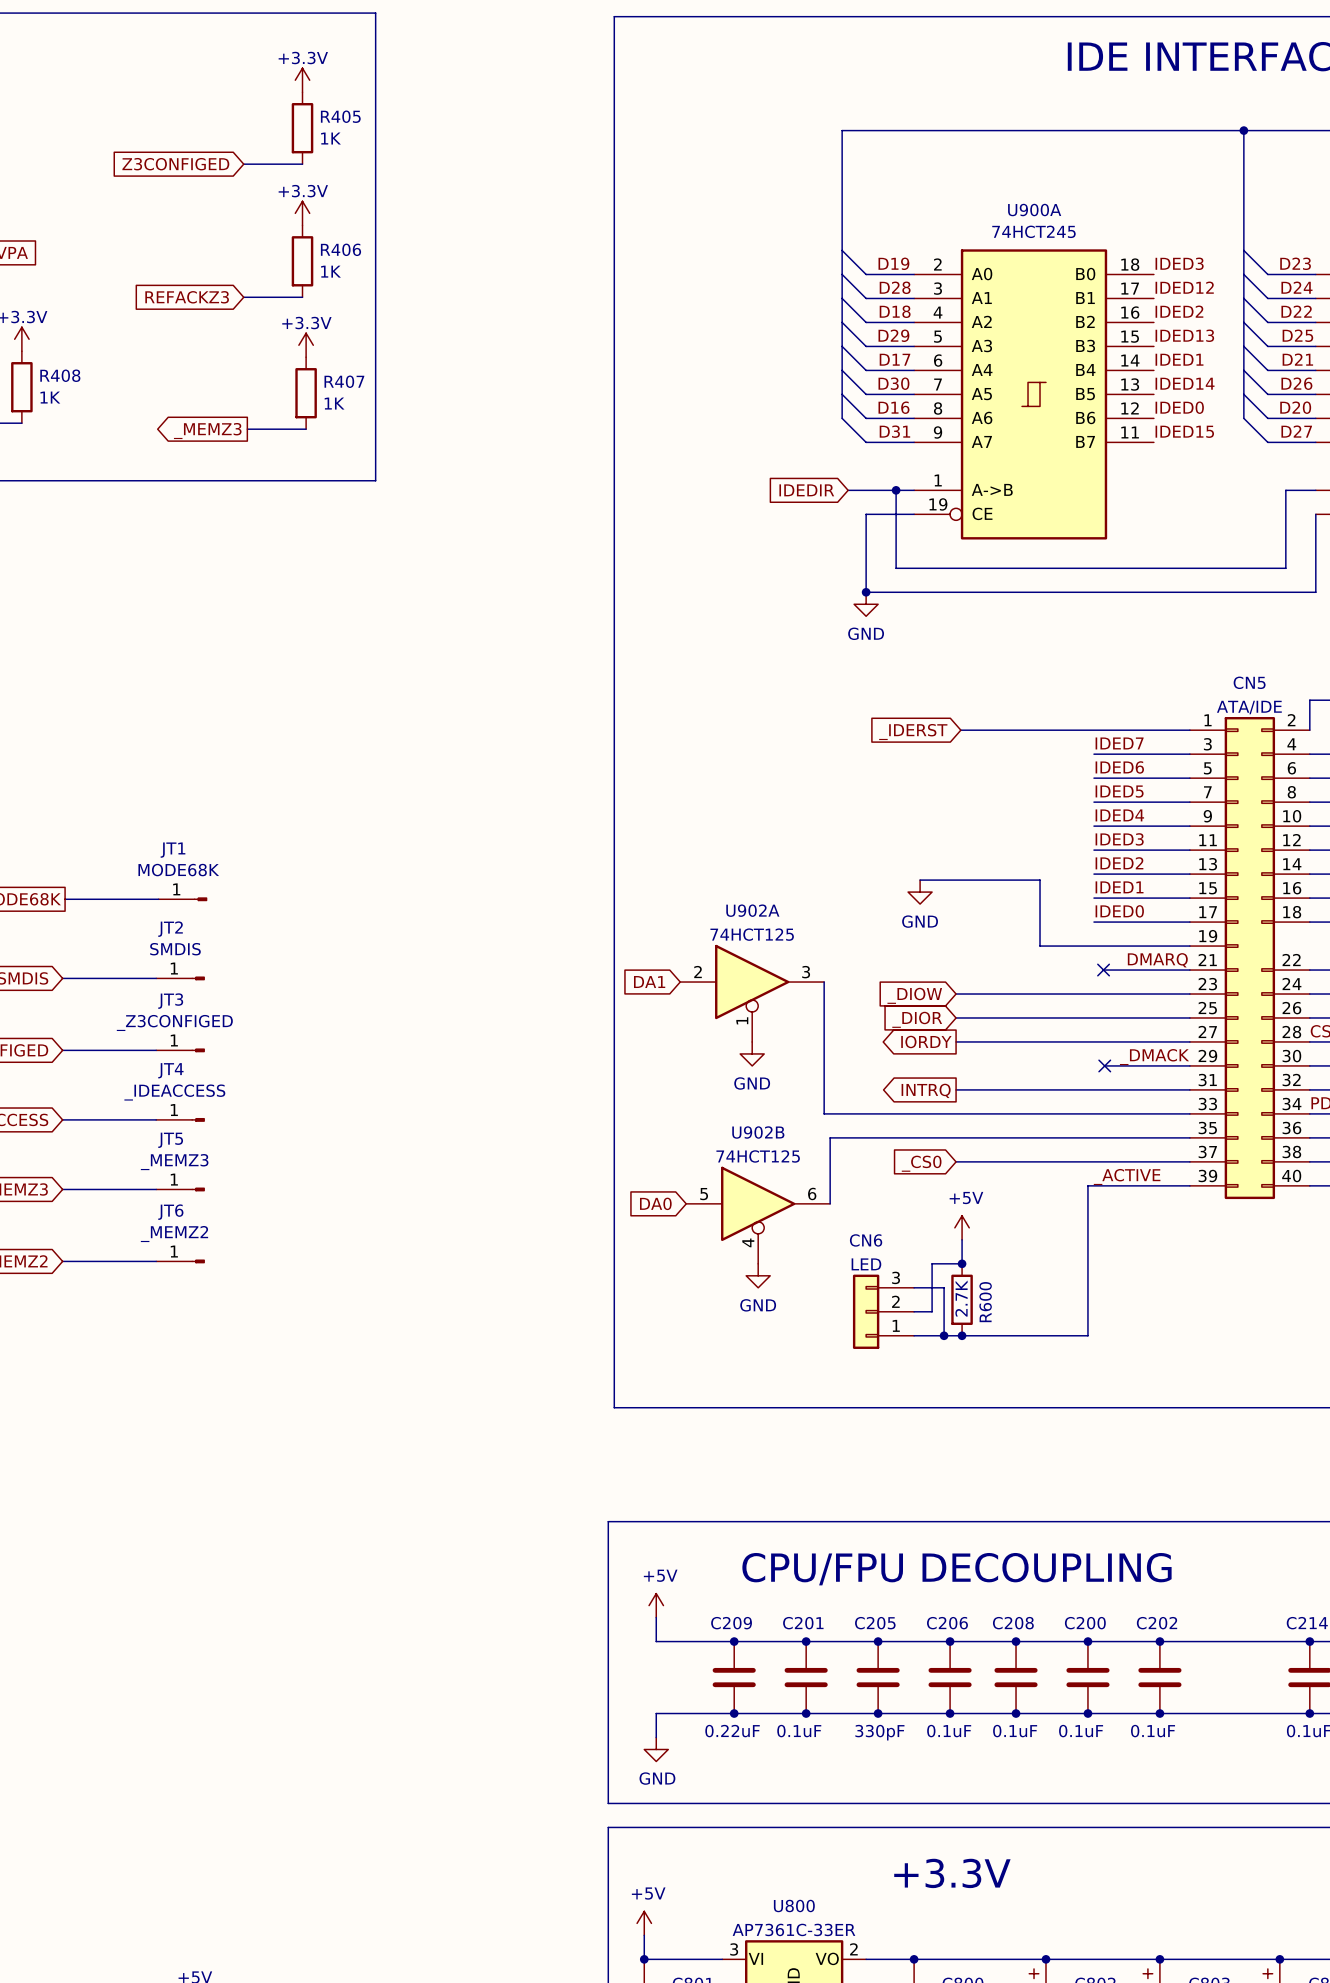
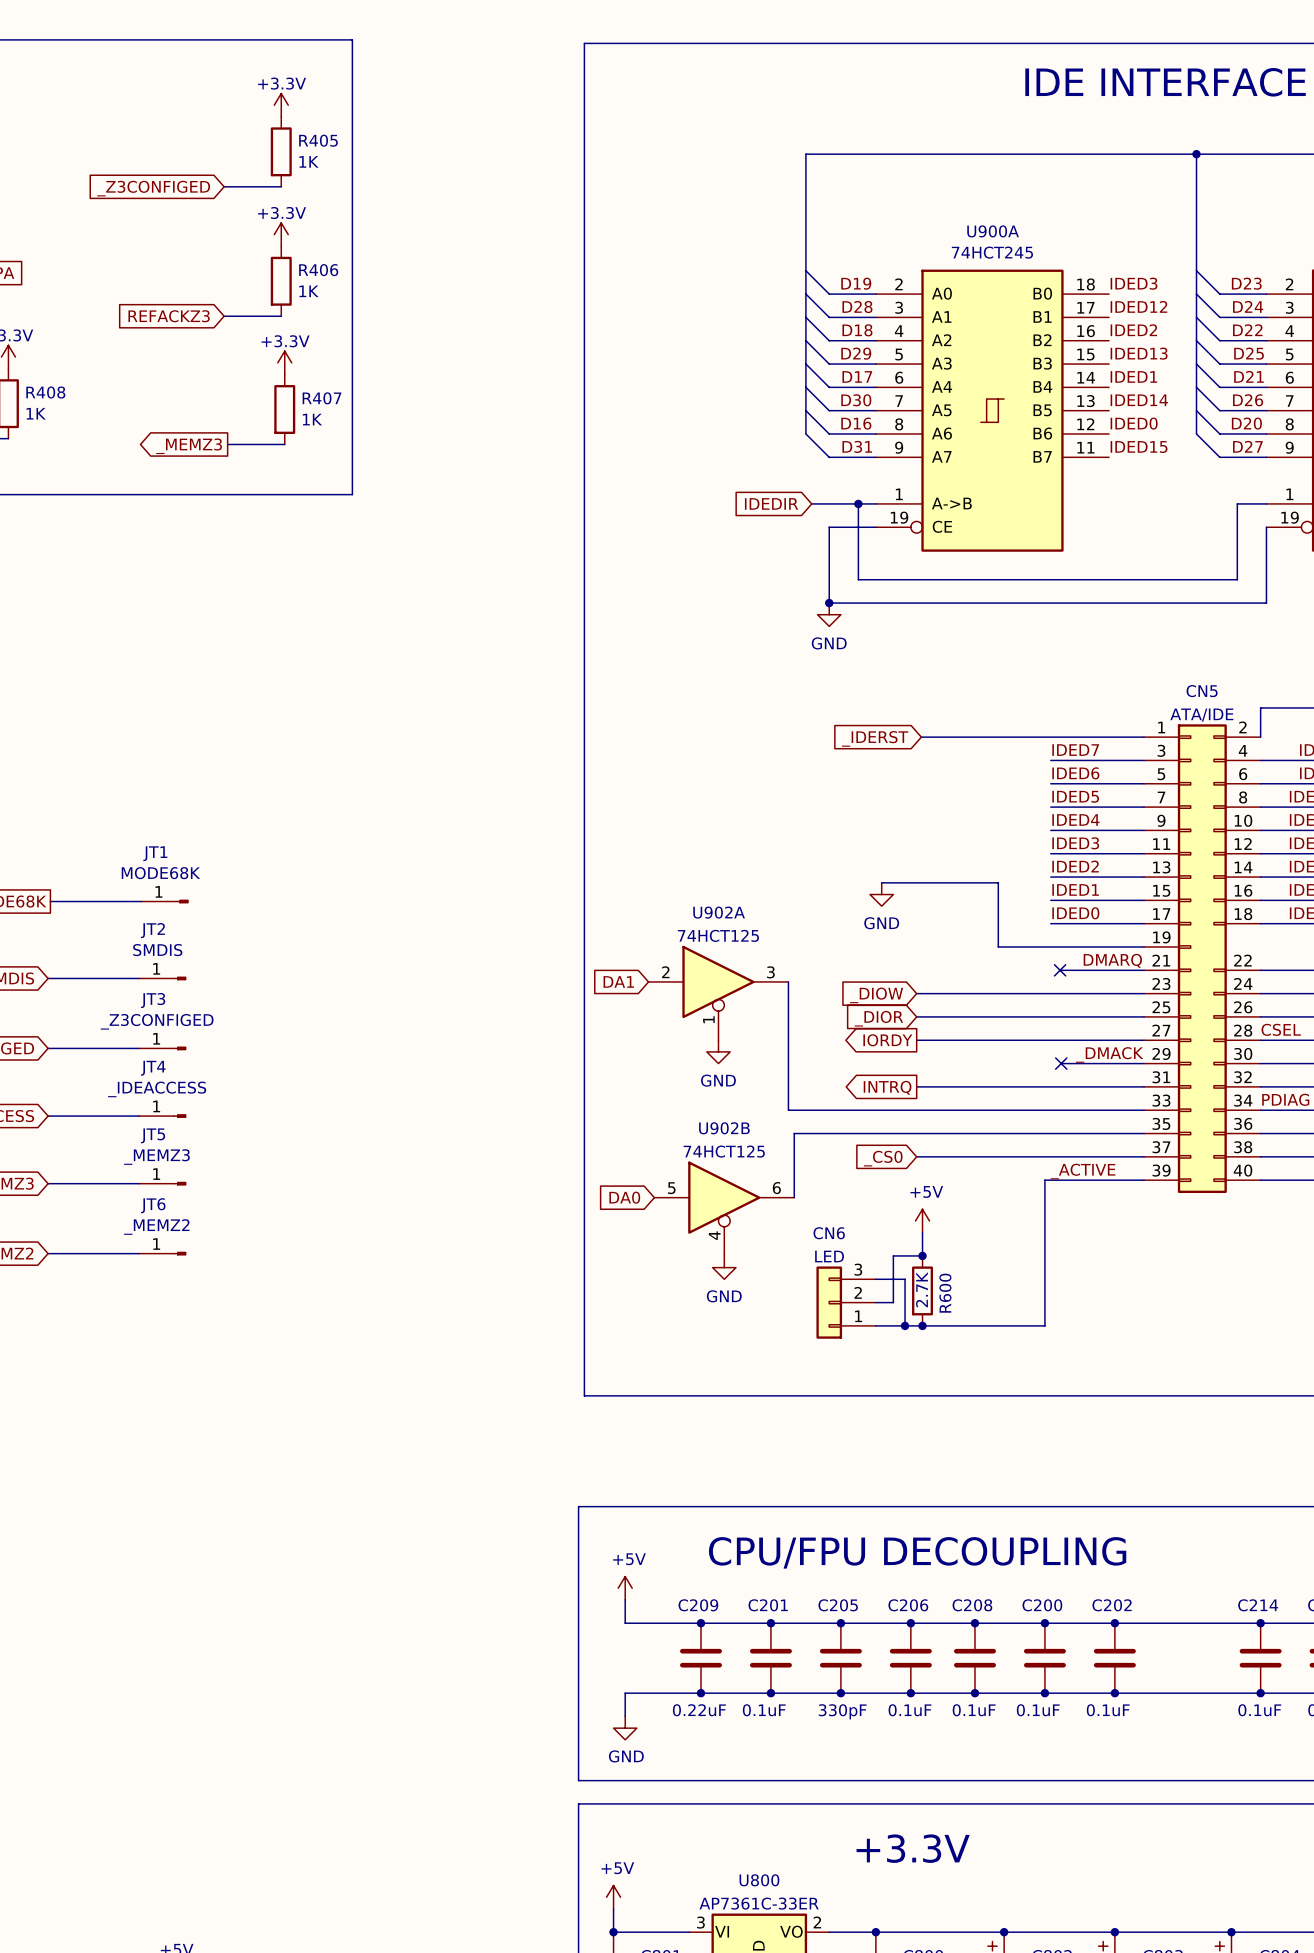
global label: Z3CONFIGED (175, 164) -> _Z3CONFIGED (153, 188)

